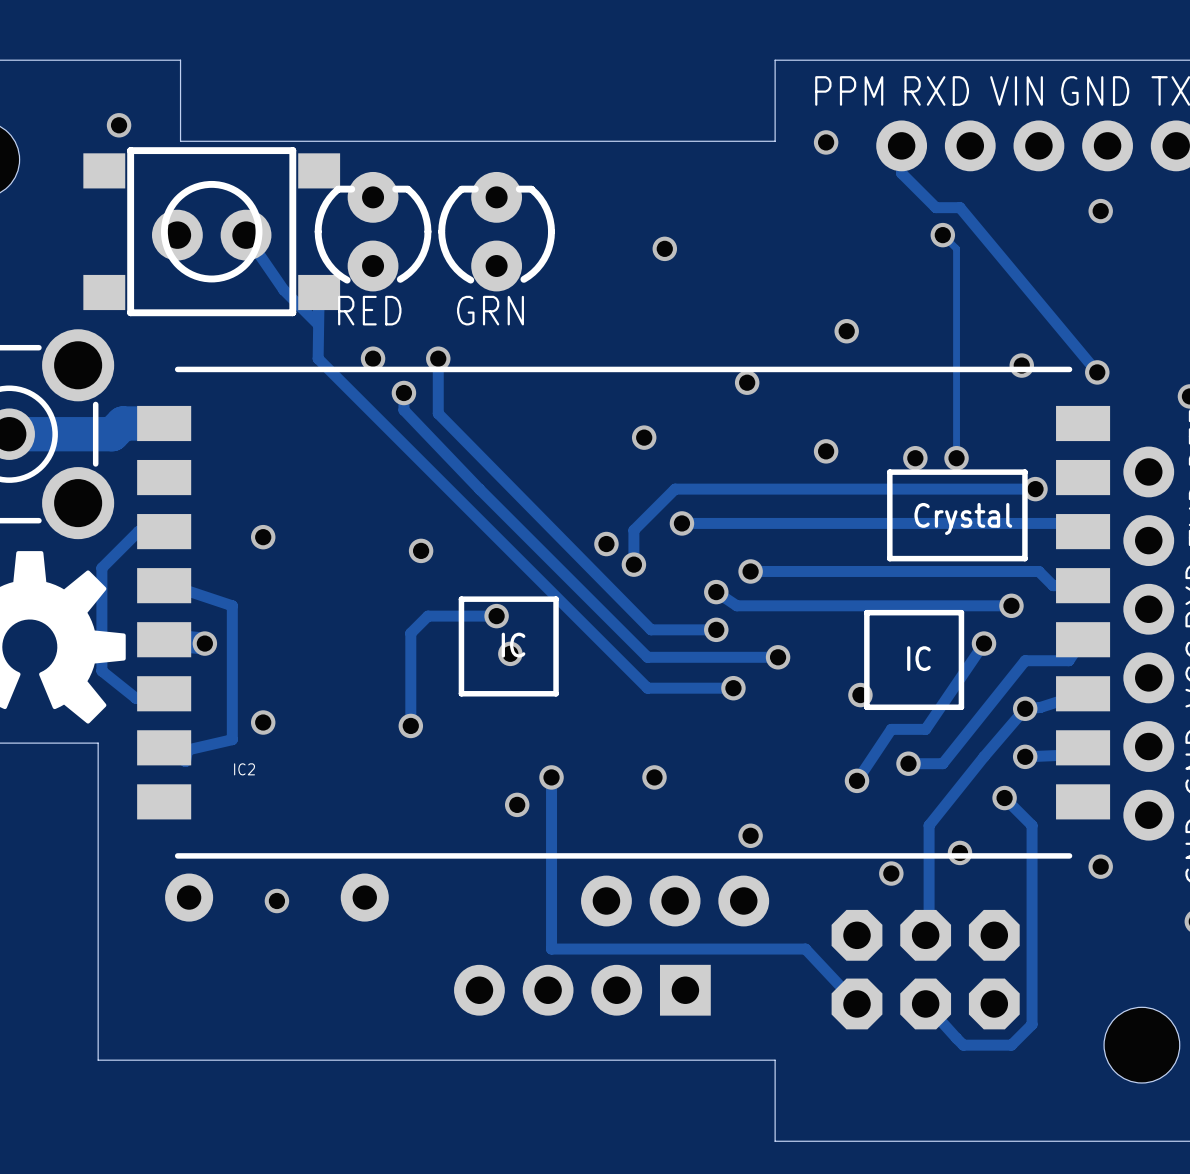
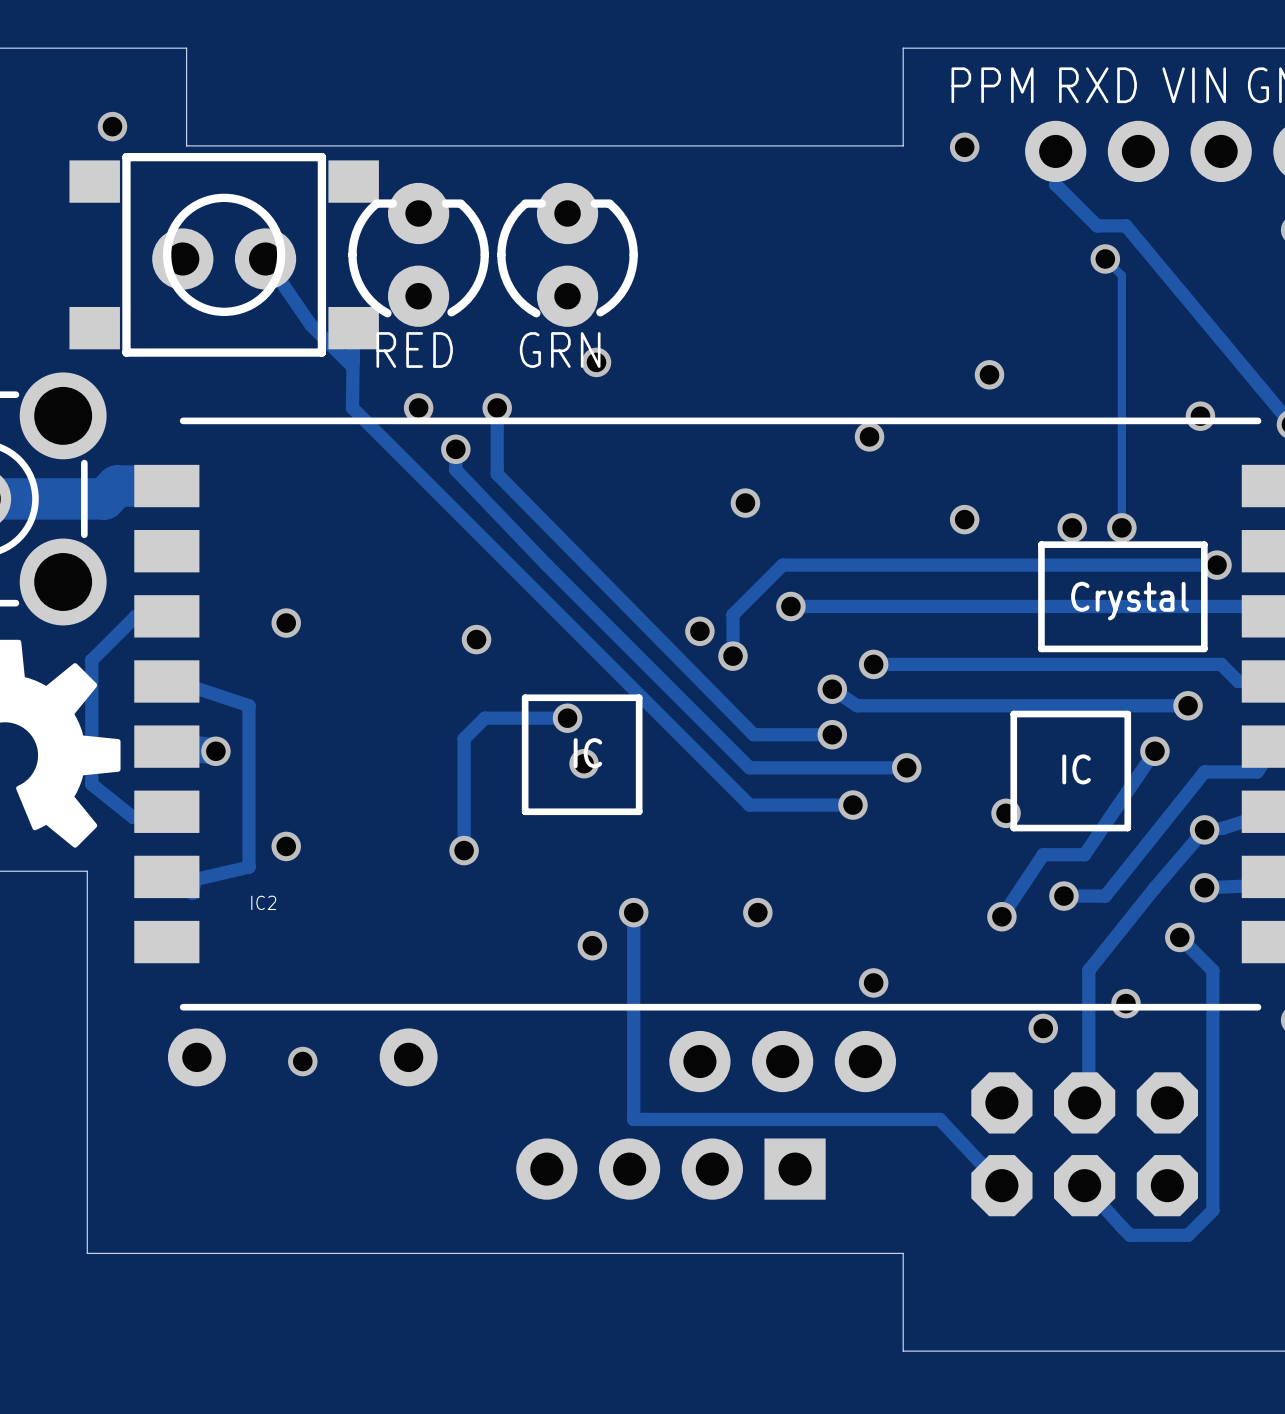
via position: (664, 248) -> (596, 362)

